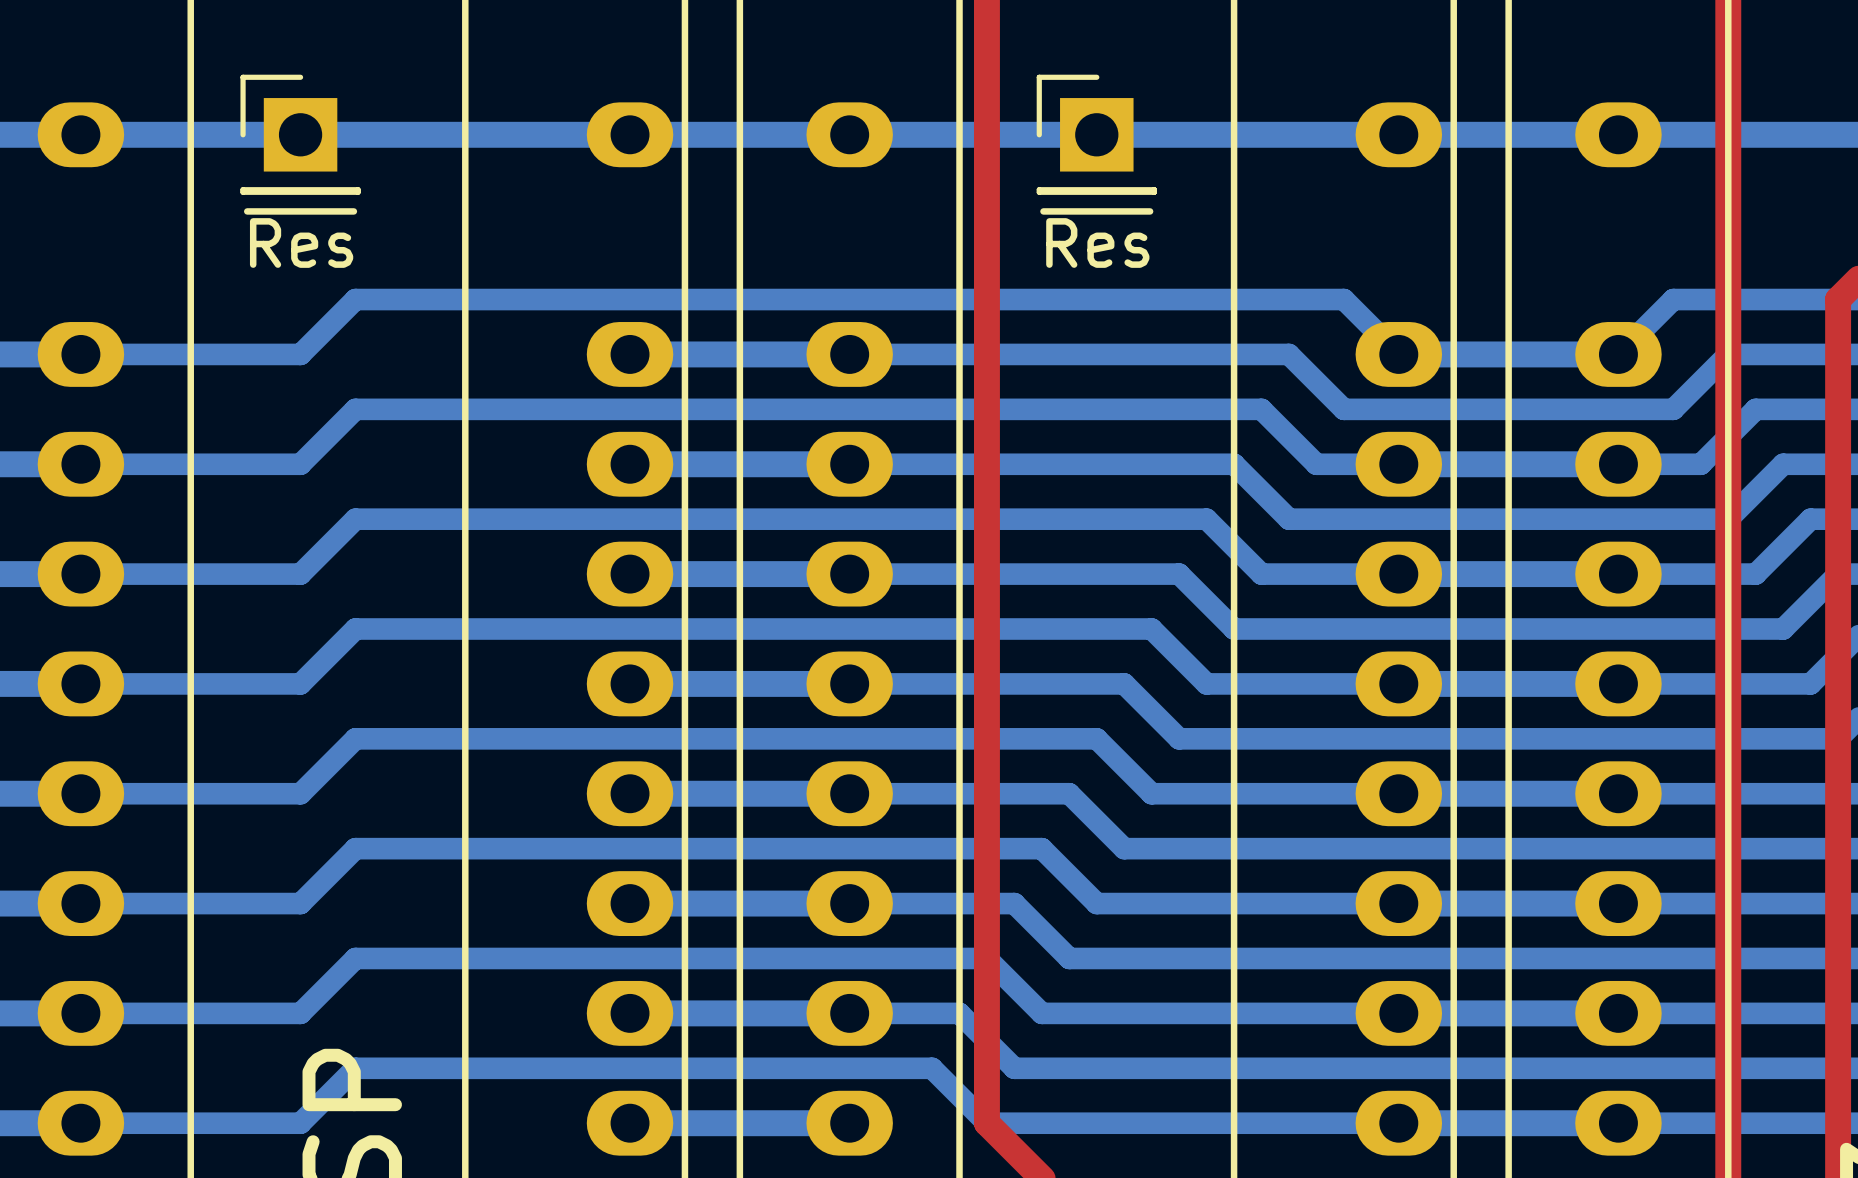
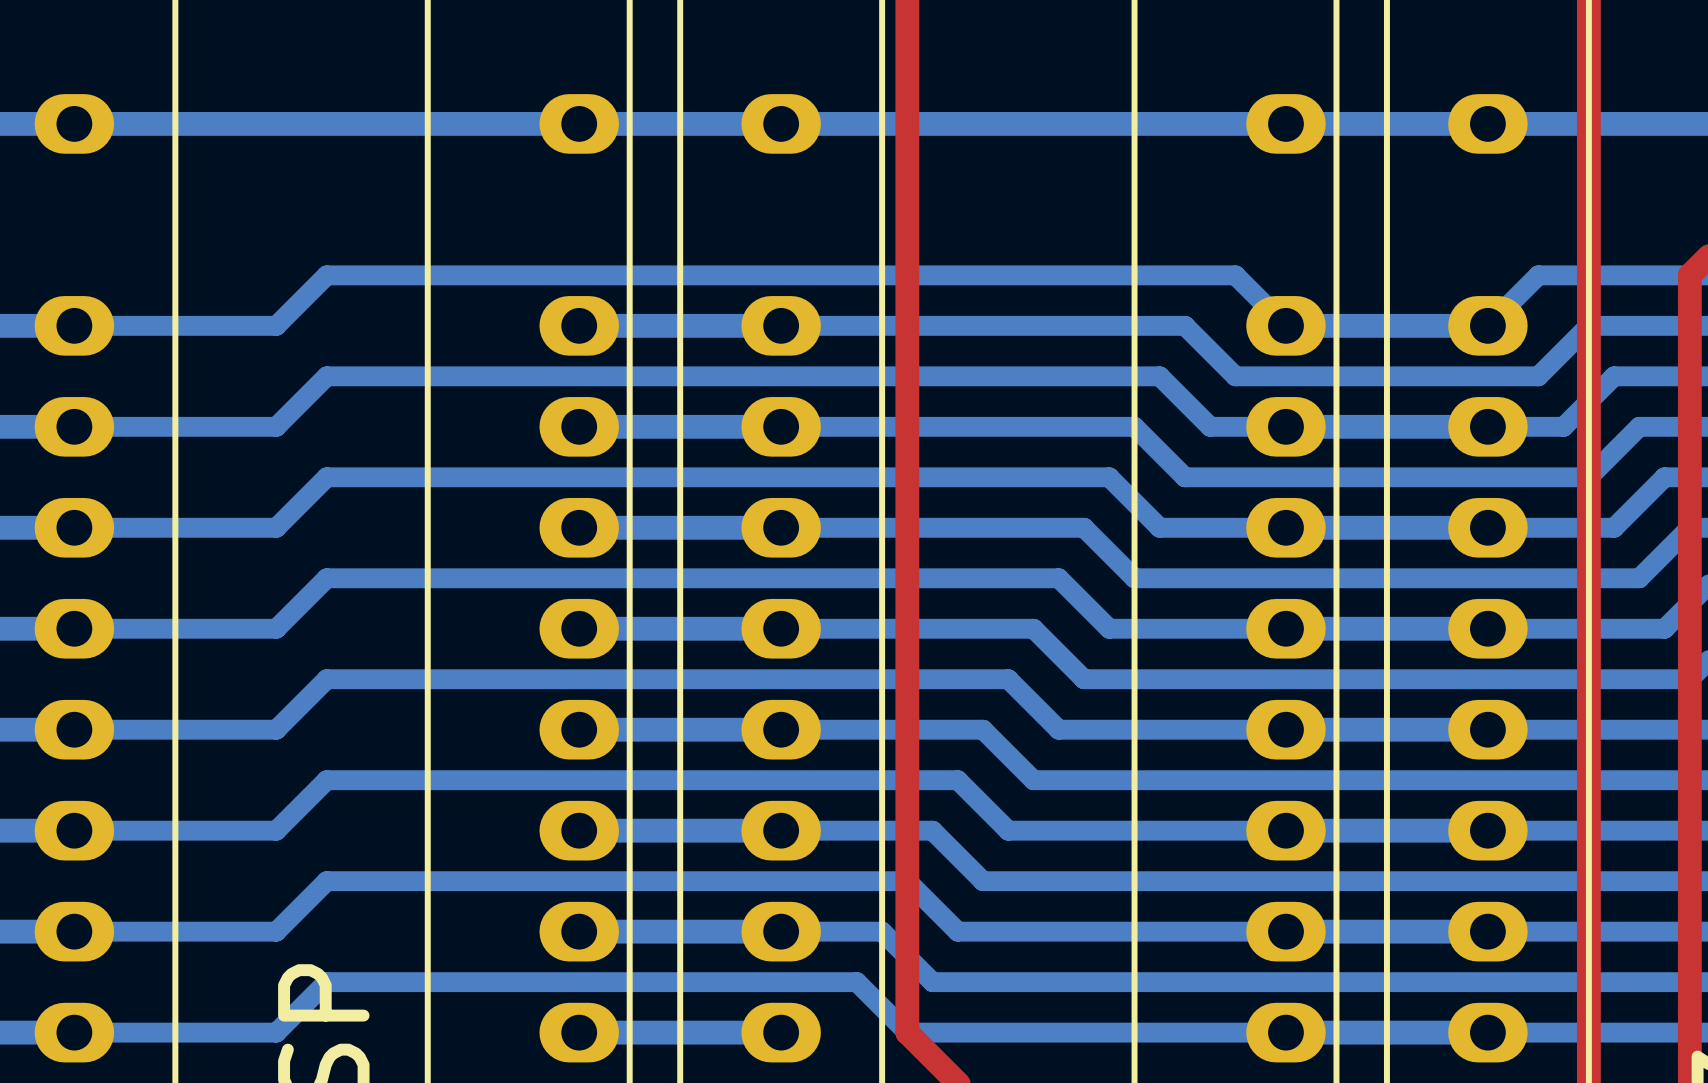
part: (300, 134) -> none
part: (1096, 134) -> none
text: ~{Res} (300, 238) -> none
text: ~{Res} (1096, 238) -> none

